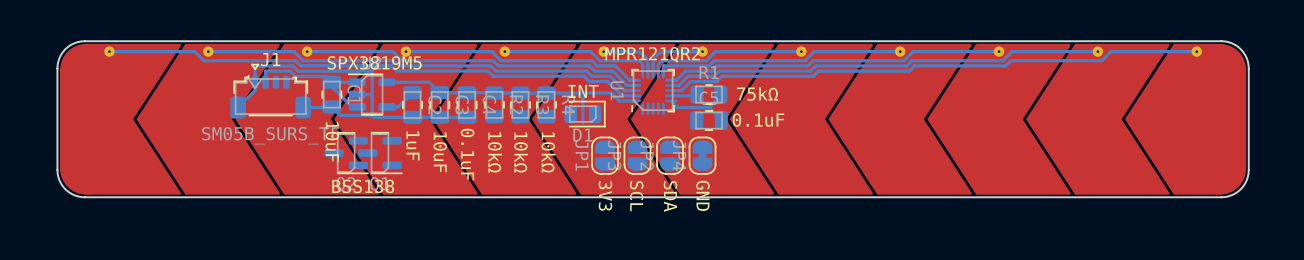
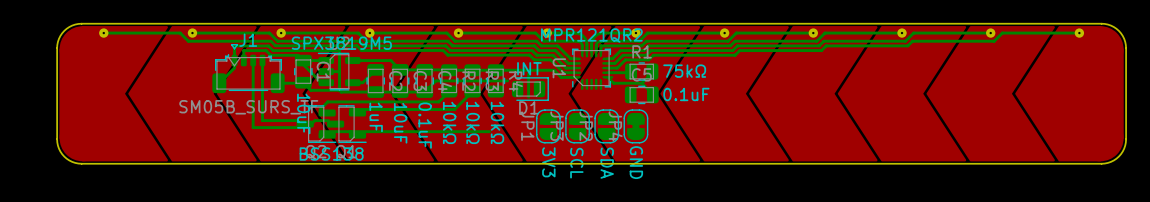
bottom track: none -> (253, 60) (253, 127) (308, 127) (315, 120) (328, 120)
bottom track: none -> (262, 60) (262, 120) (298, 120)
bottom track: none -> (507, 80) (435, 80) (424, 92)
bottom track: none -> (449, 91) (438, 101) (327, 101) (320, 109)
bottom track: none -> (472, 91) (454, 109) (350, 109)
bottom track: none -> (489, 131) (320, 131)

